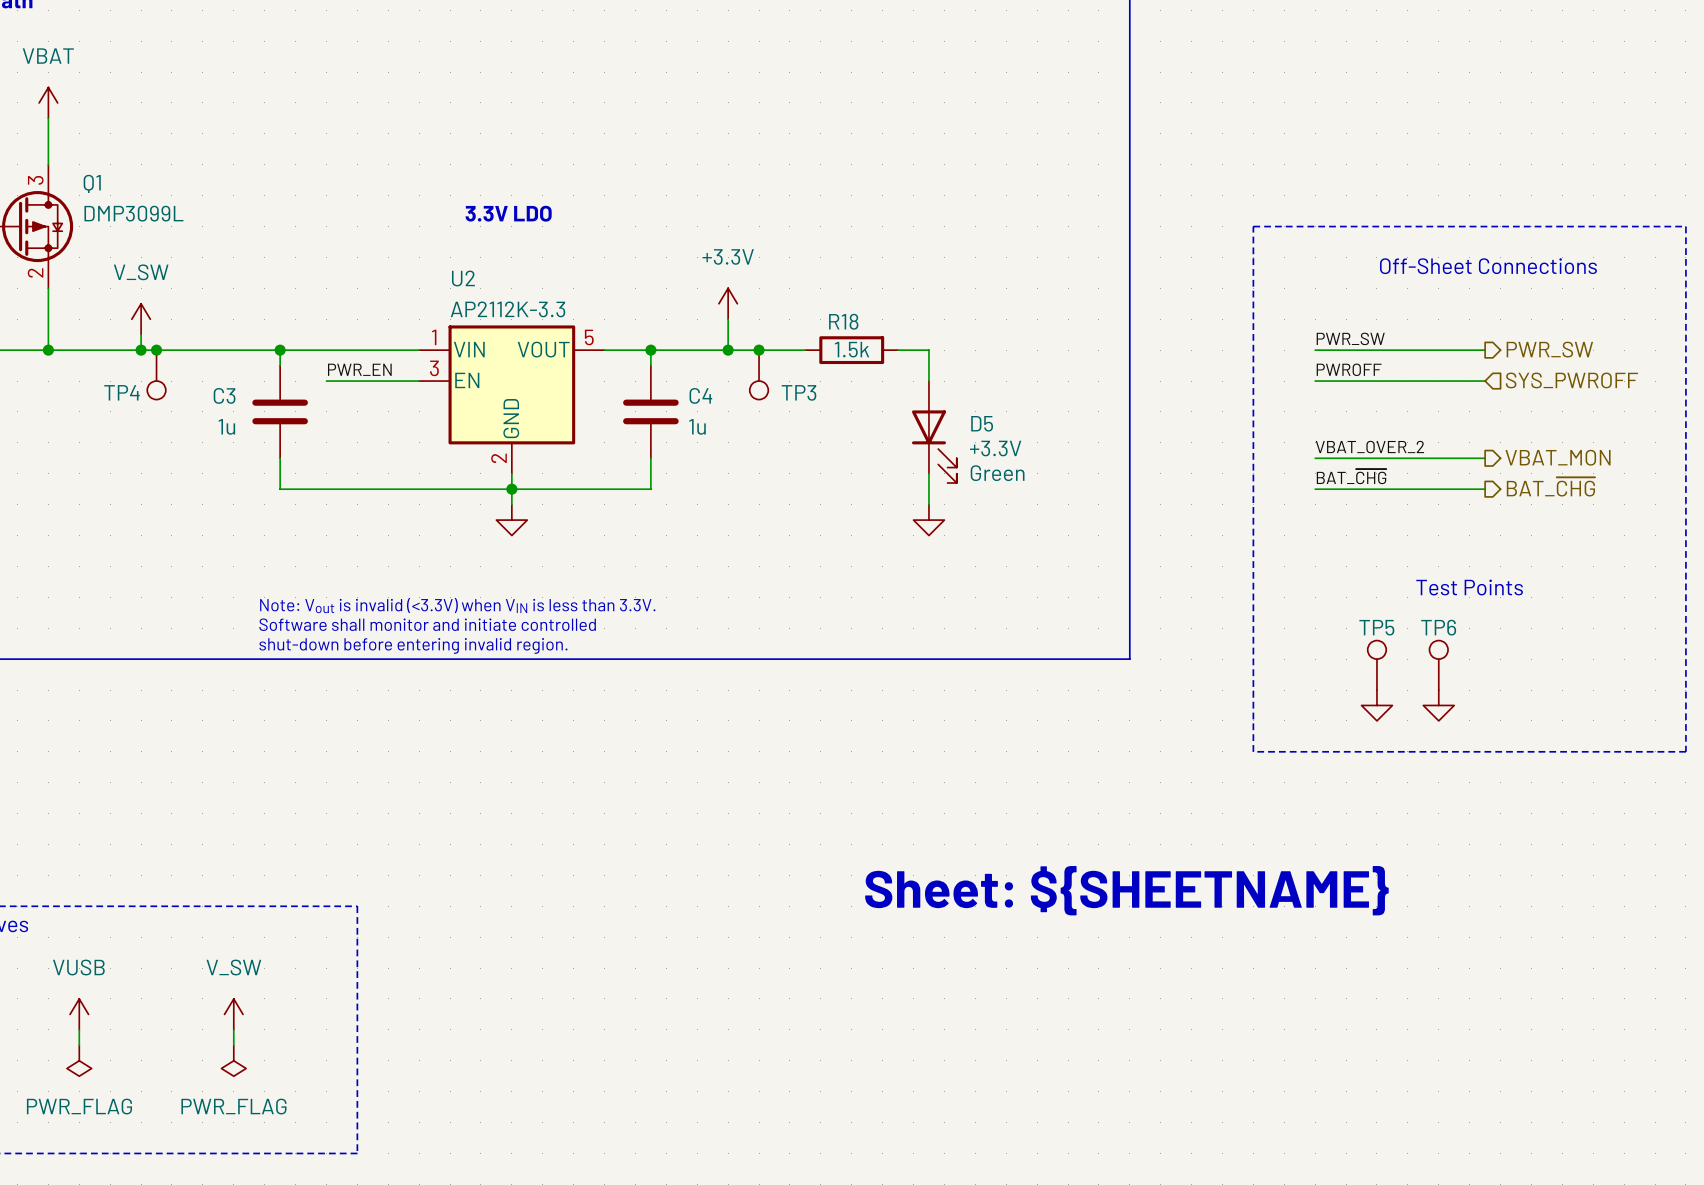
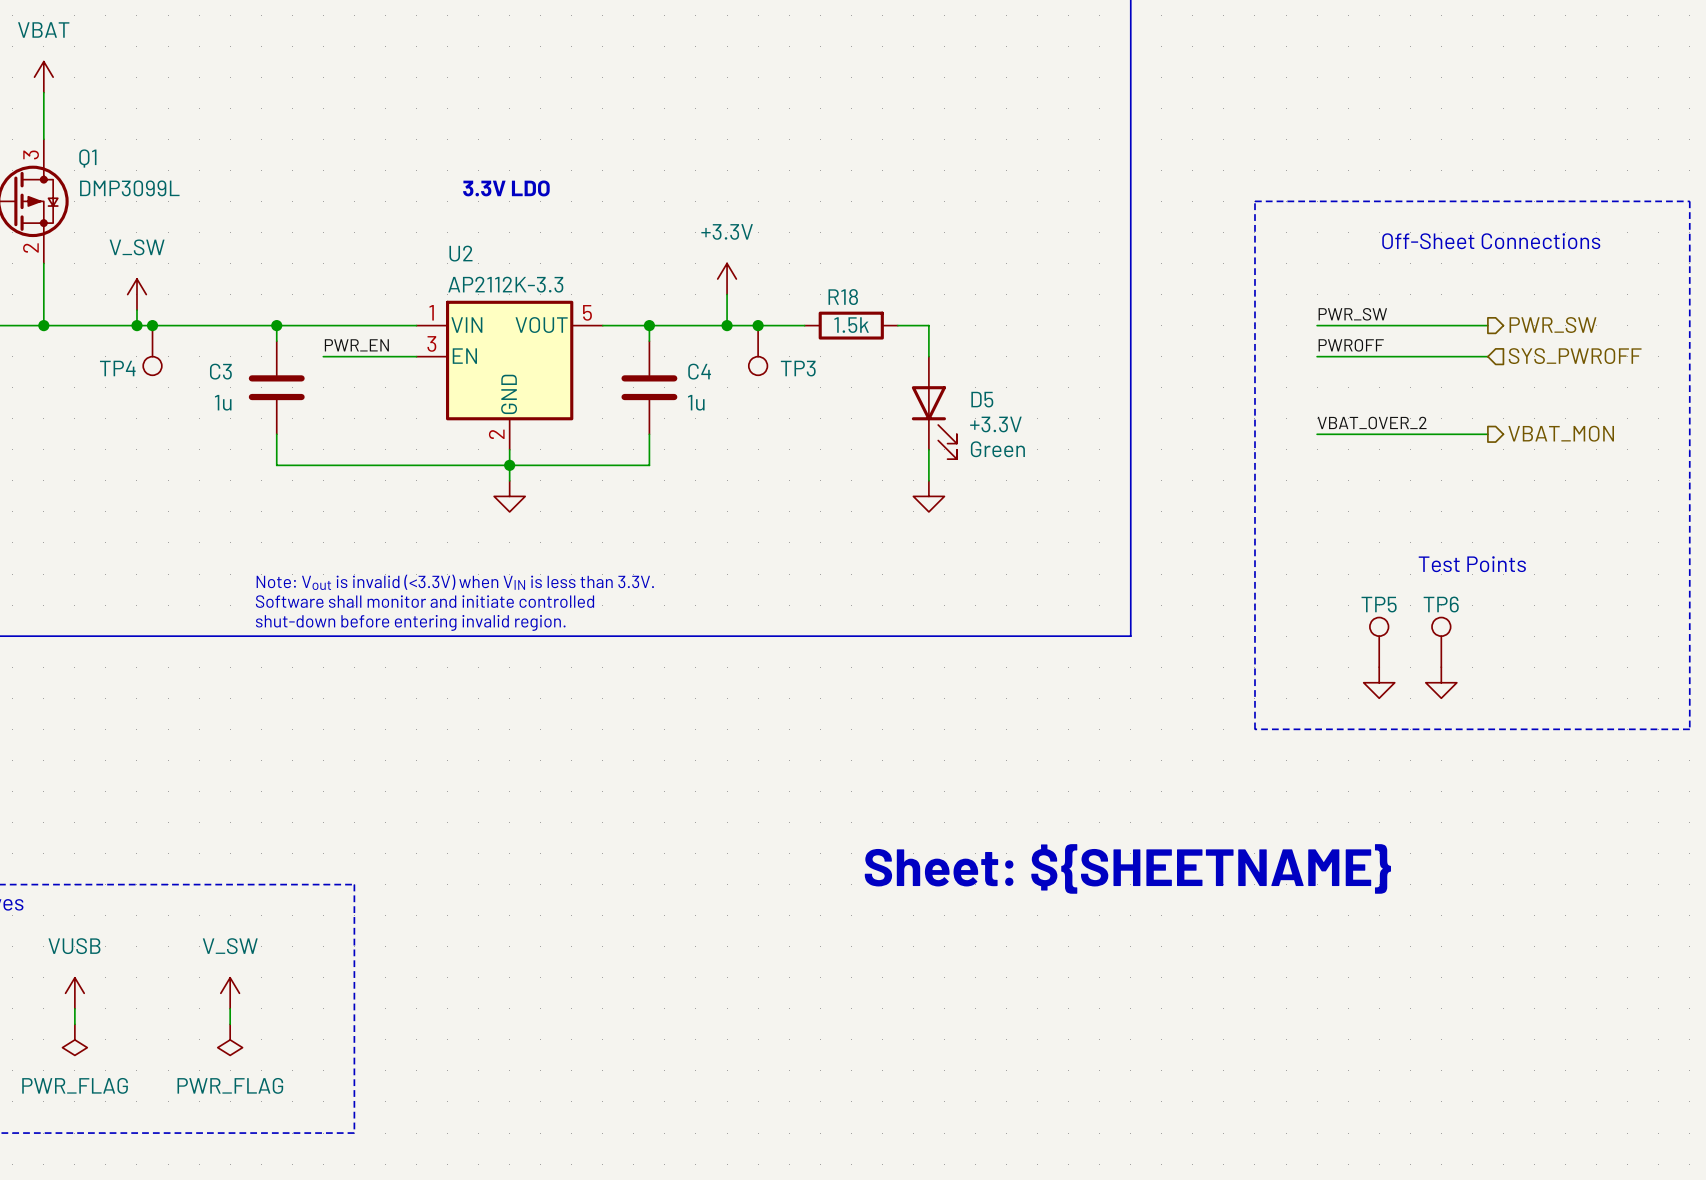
label: BAT_~{CHG} (1351, 476) -> none
hierarchical label: BAT_~{CHG} (1550, 486) -> none
wire: (1315, 489) (1485, 489) -> none

